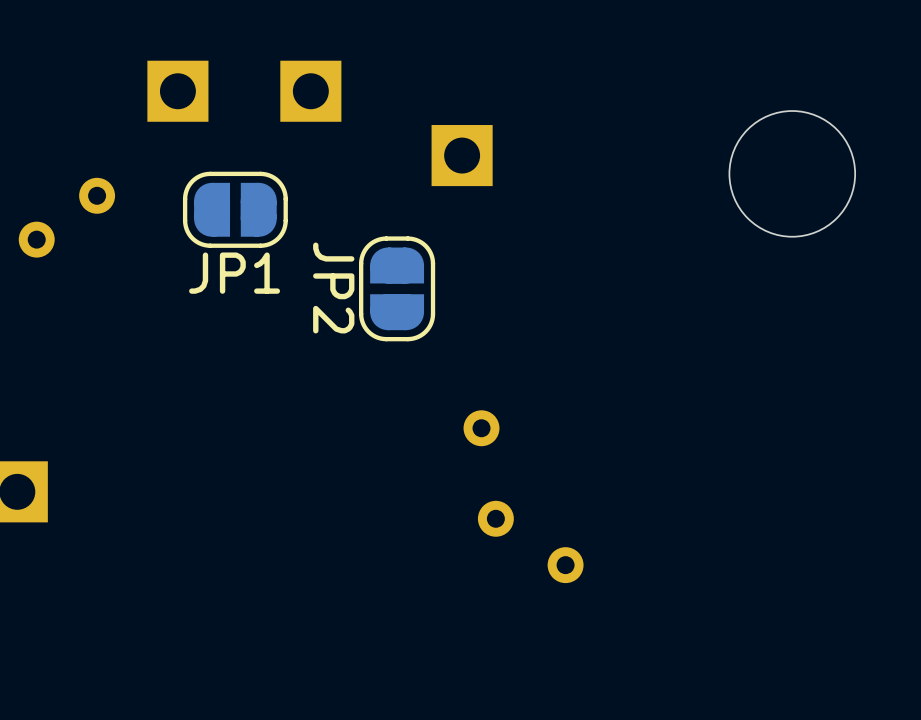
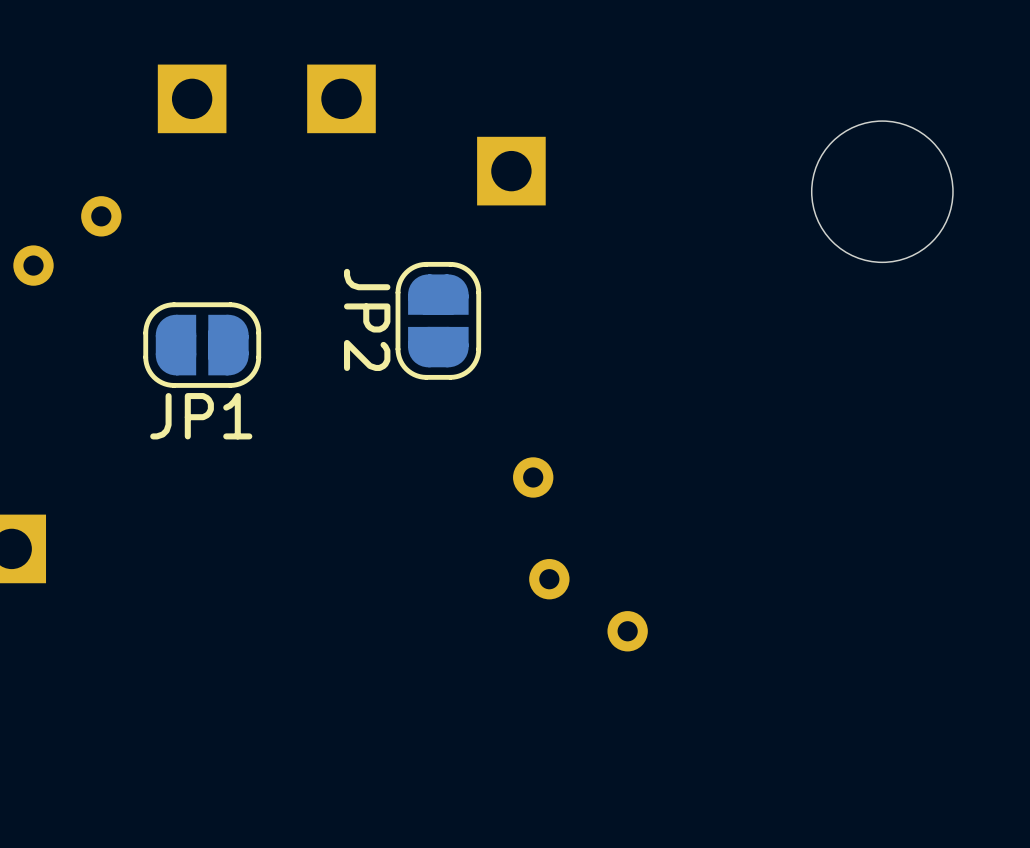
JP1 position: (235, 209) -> (202, 345)

